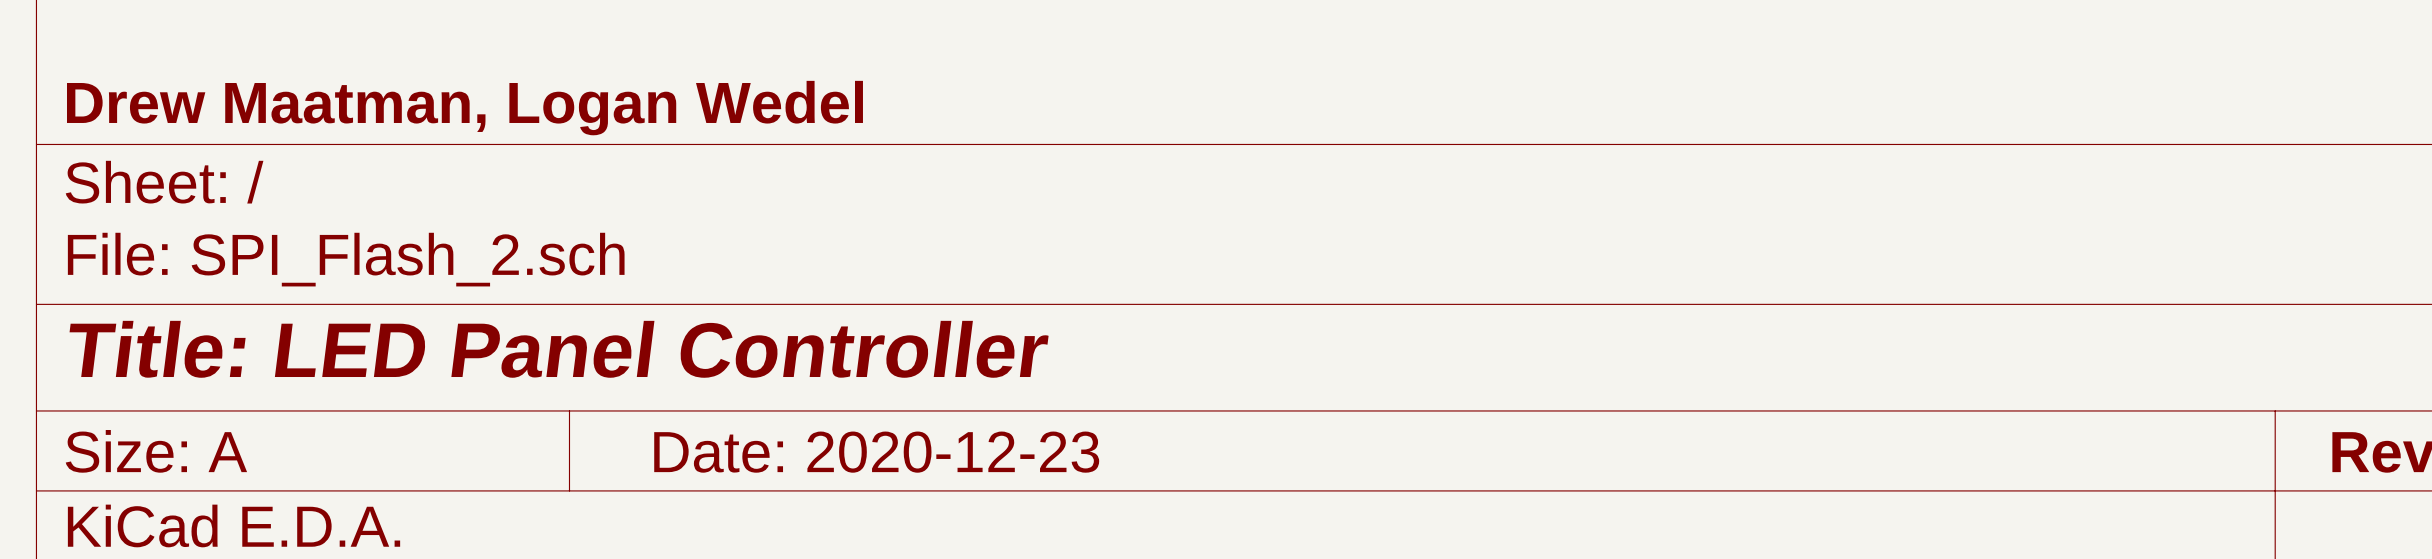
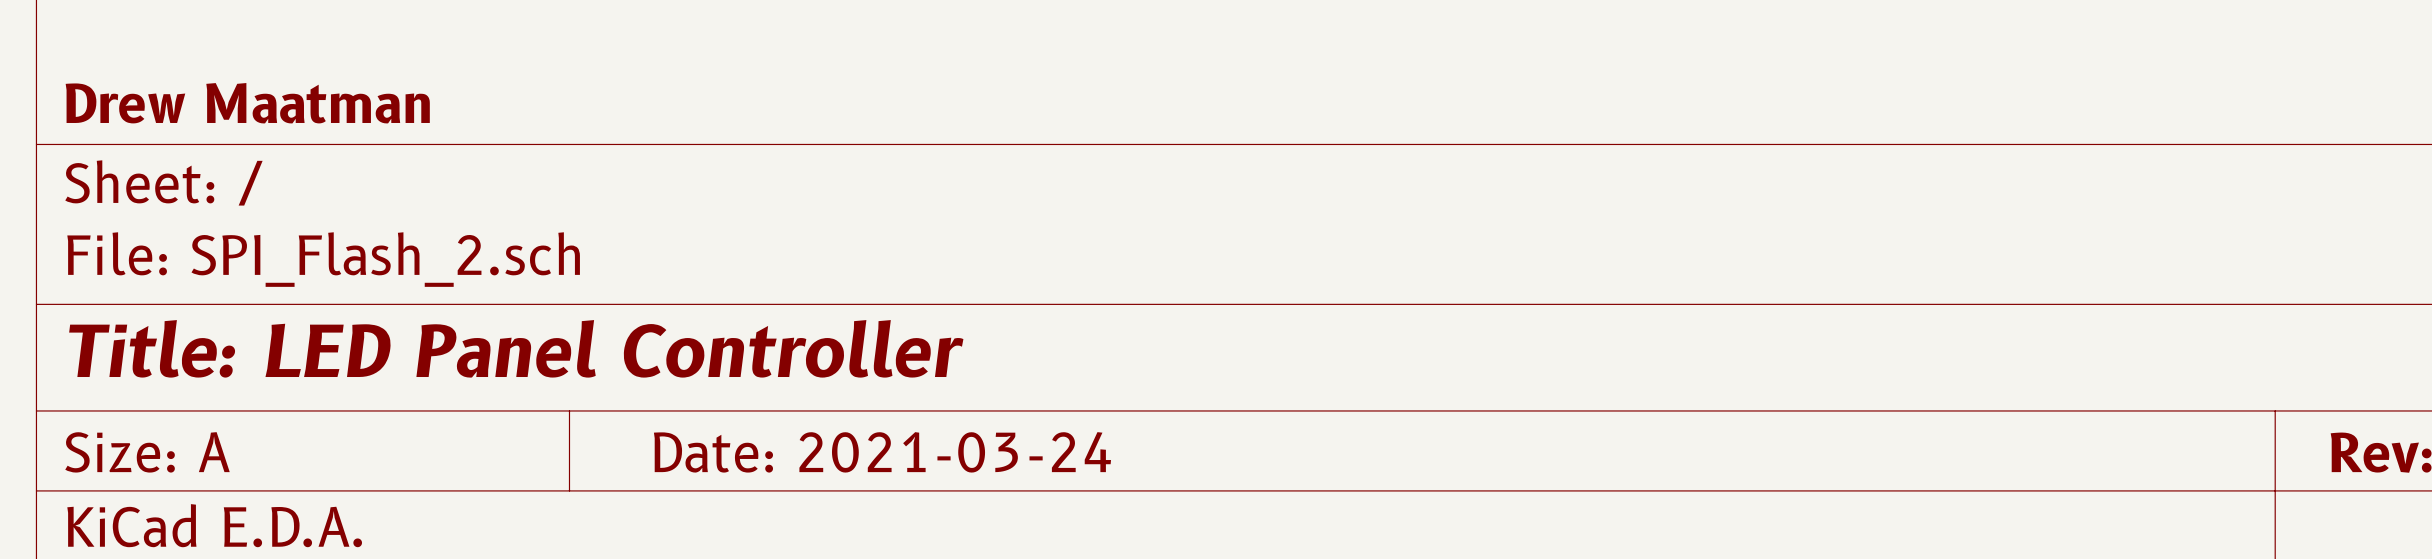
title block: Drew Maatman, Logan Wedel (464, 108) -> Drew Maatman (247, 103)
title block: Date: 2020-12-23 (876, 452) -> Date: 2021-03-24 (882, 452)

